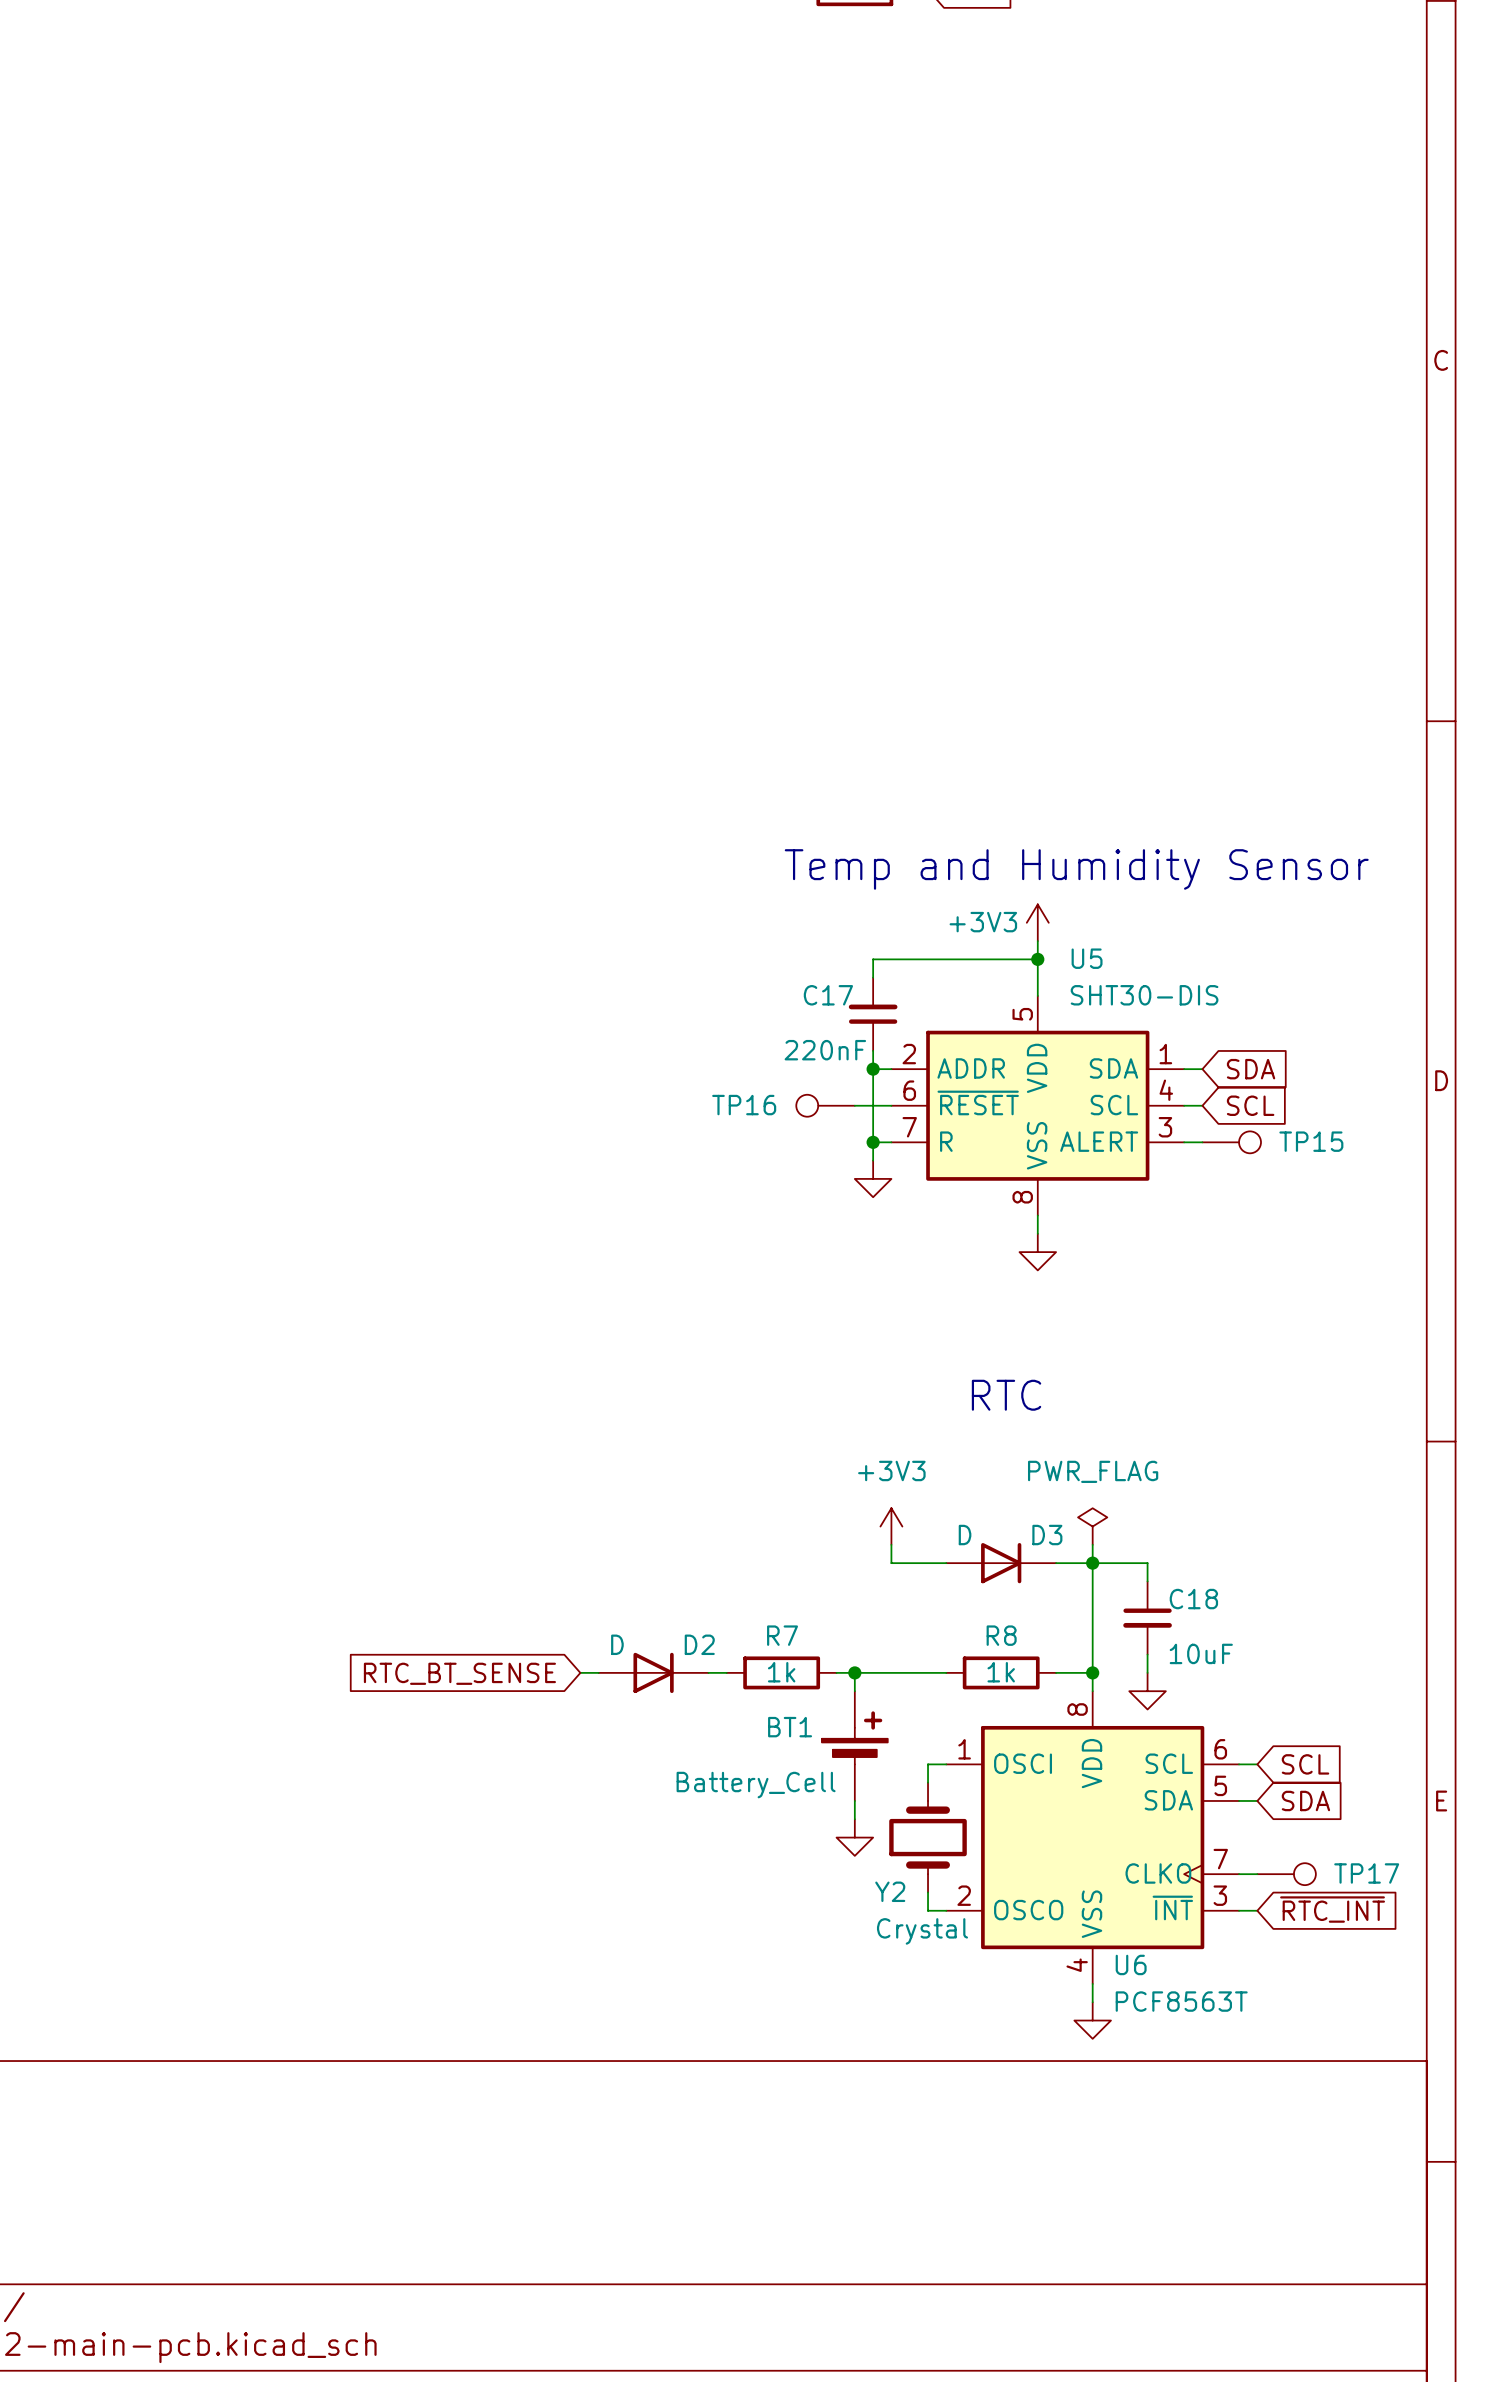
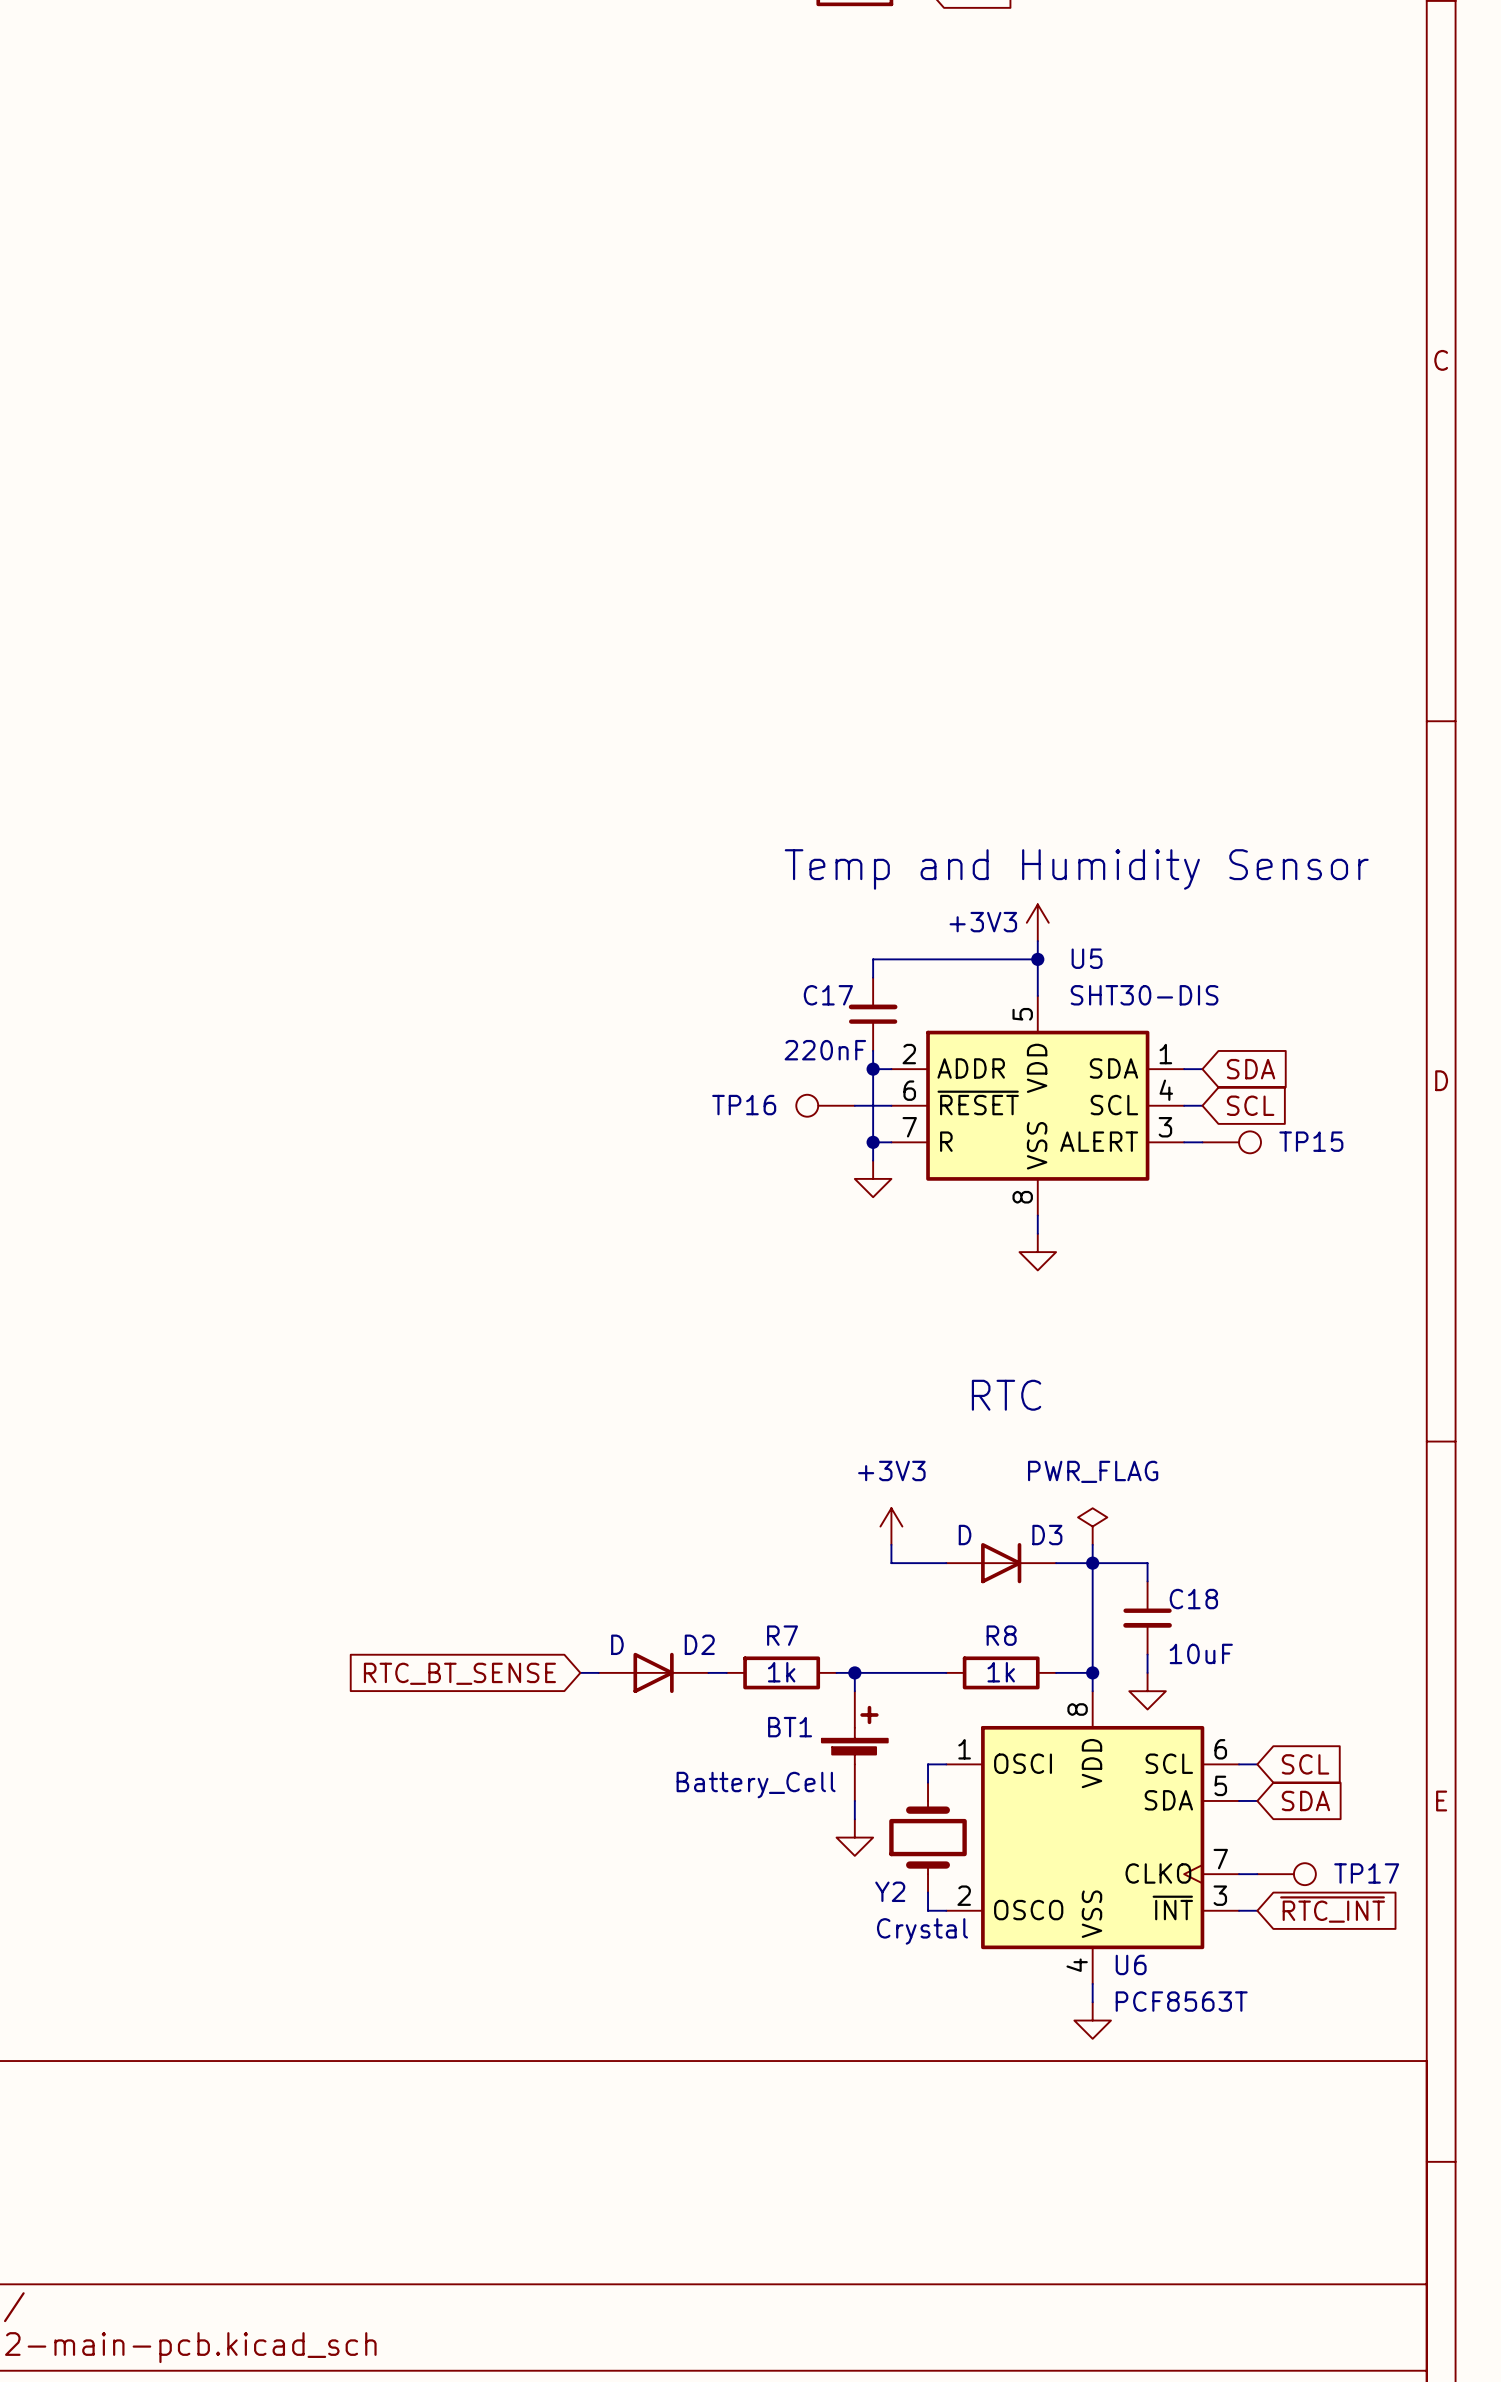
BT1 symbol: [821, 1691, 888, 1801] -> [821, 1691, 888, 1801]

